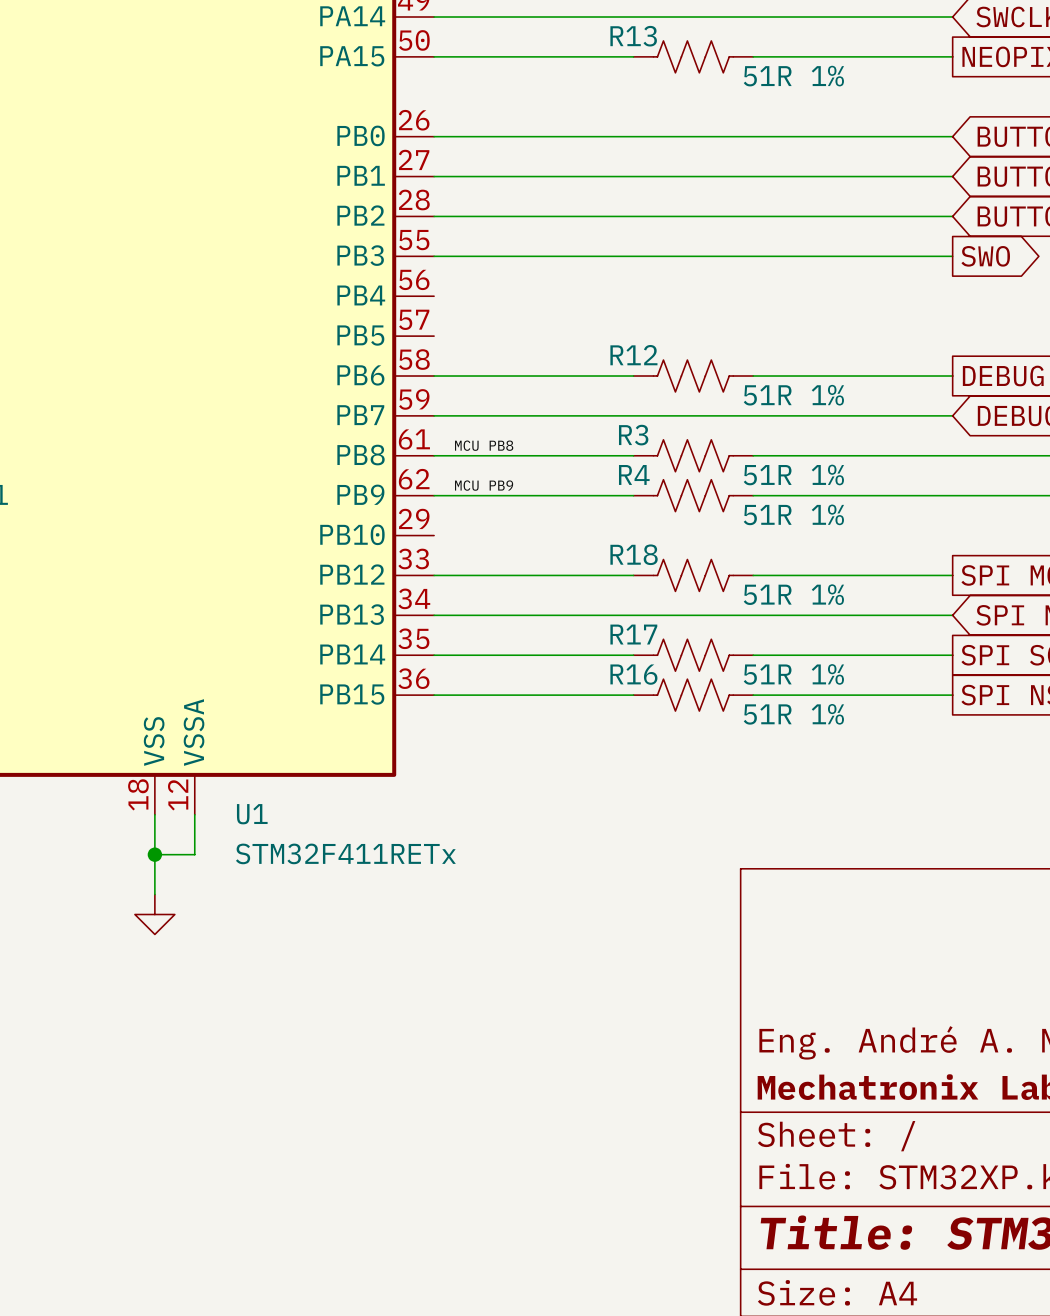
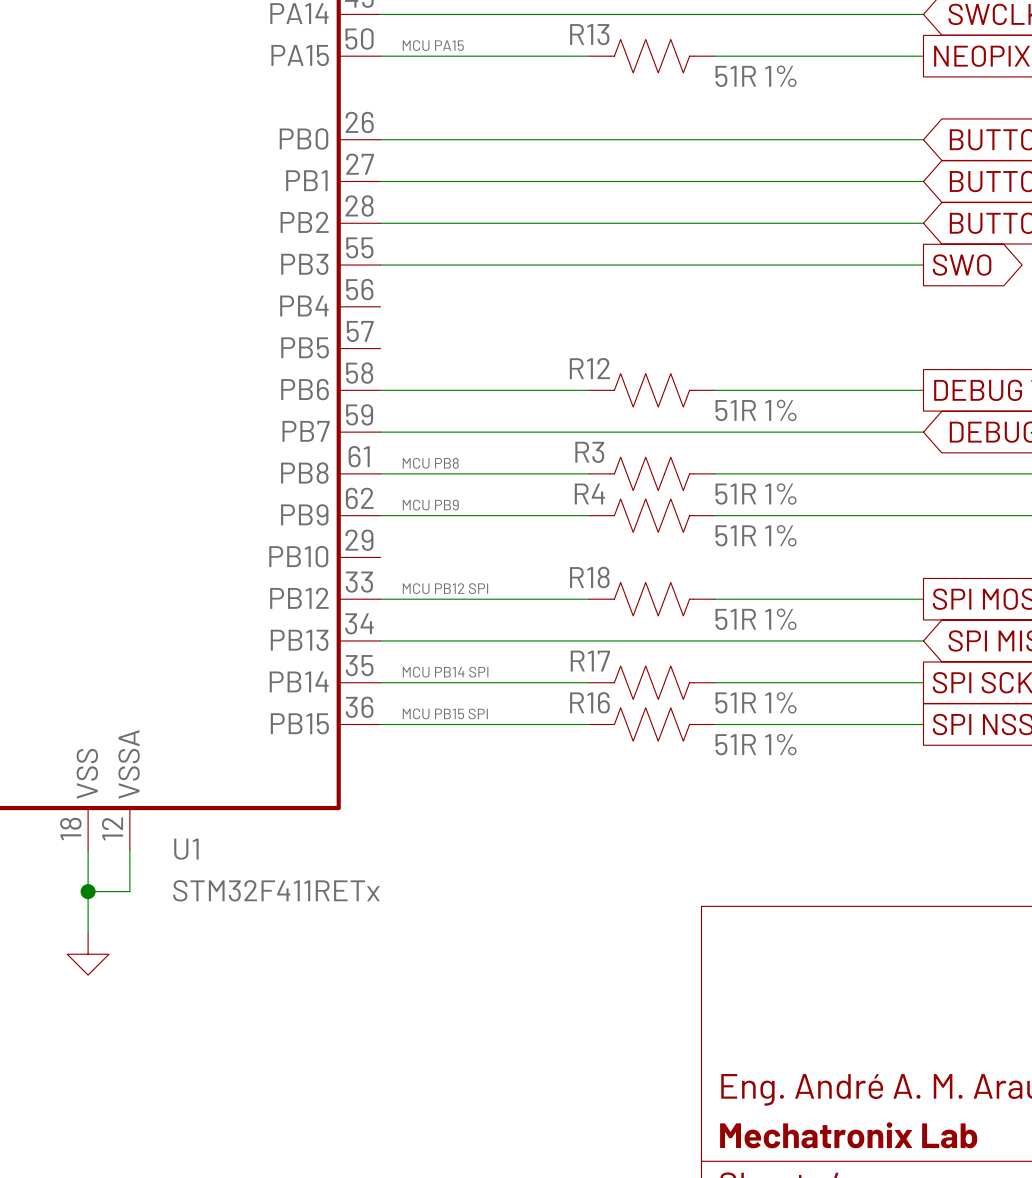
label: none -> MCU PA15 (433, 45)
label: none -> MCU PB12 SPI (445, 588)
label: none -> MCU PB14 SPI (445, 672)
label: none -> MCU PB15 SPI (445, 713)

